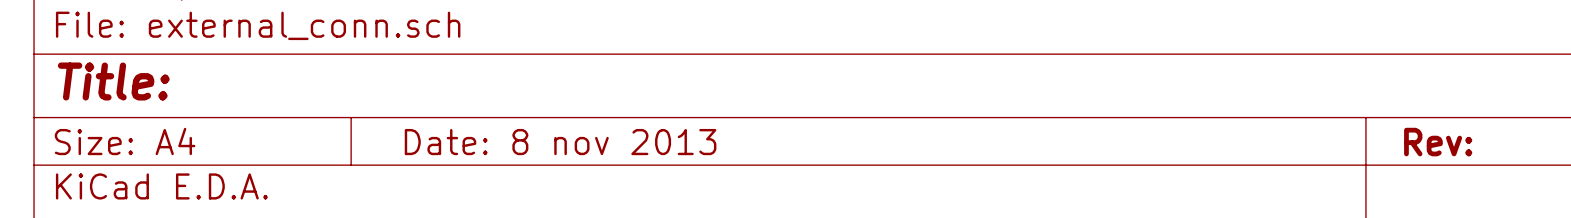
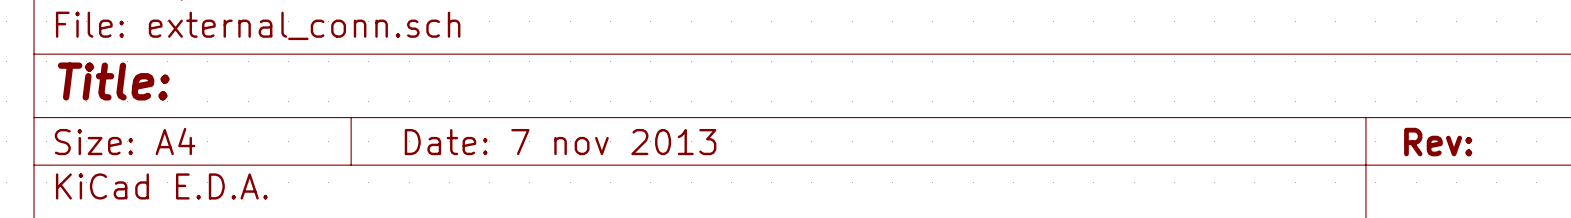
title block: Date: 8 nov 2013 (560, 142) -> Date: 7 nov 2013 (560, 142)

